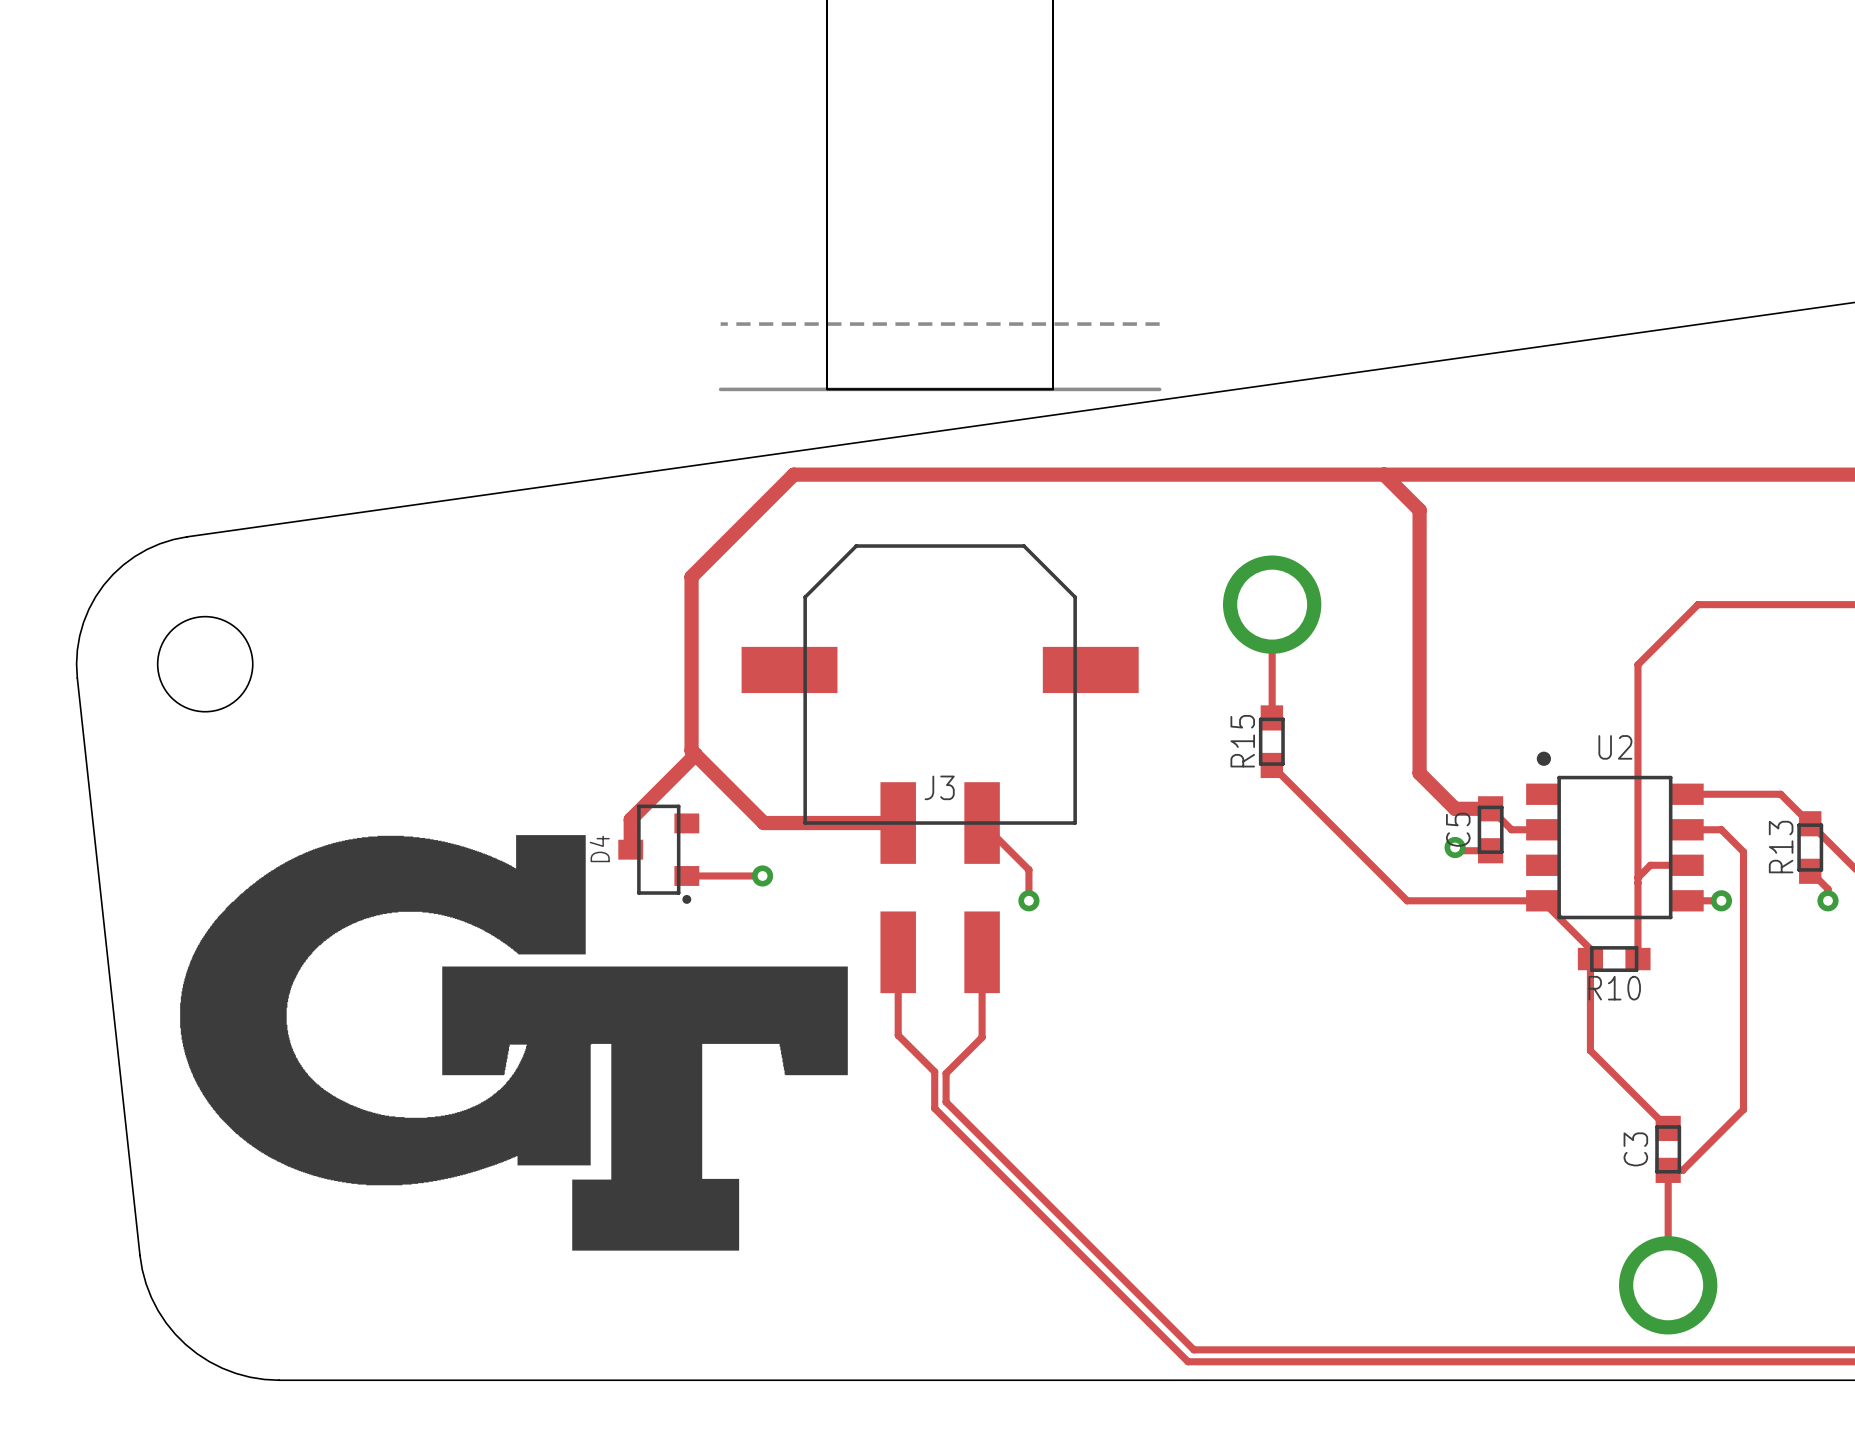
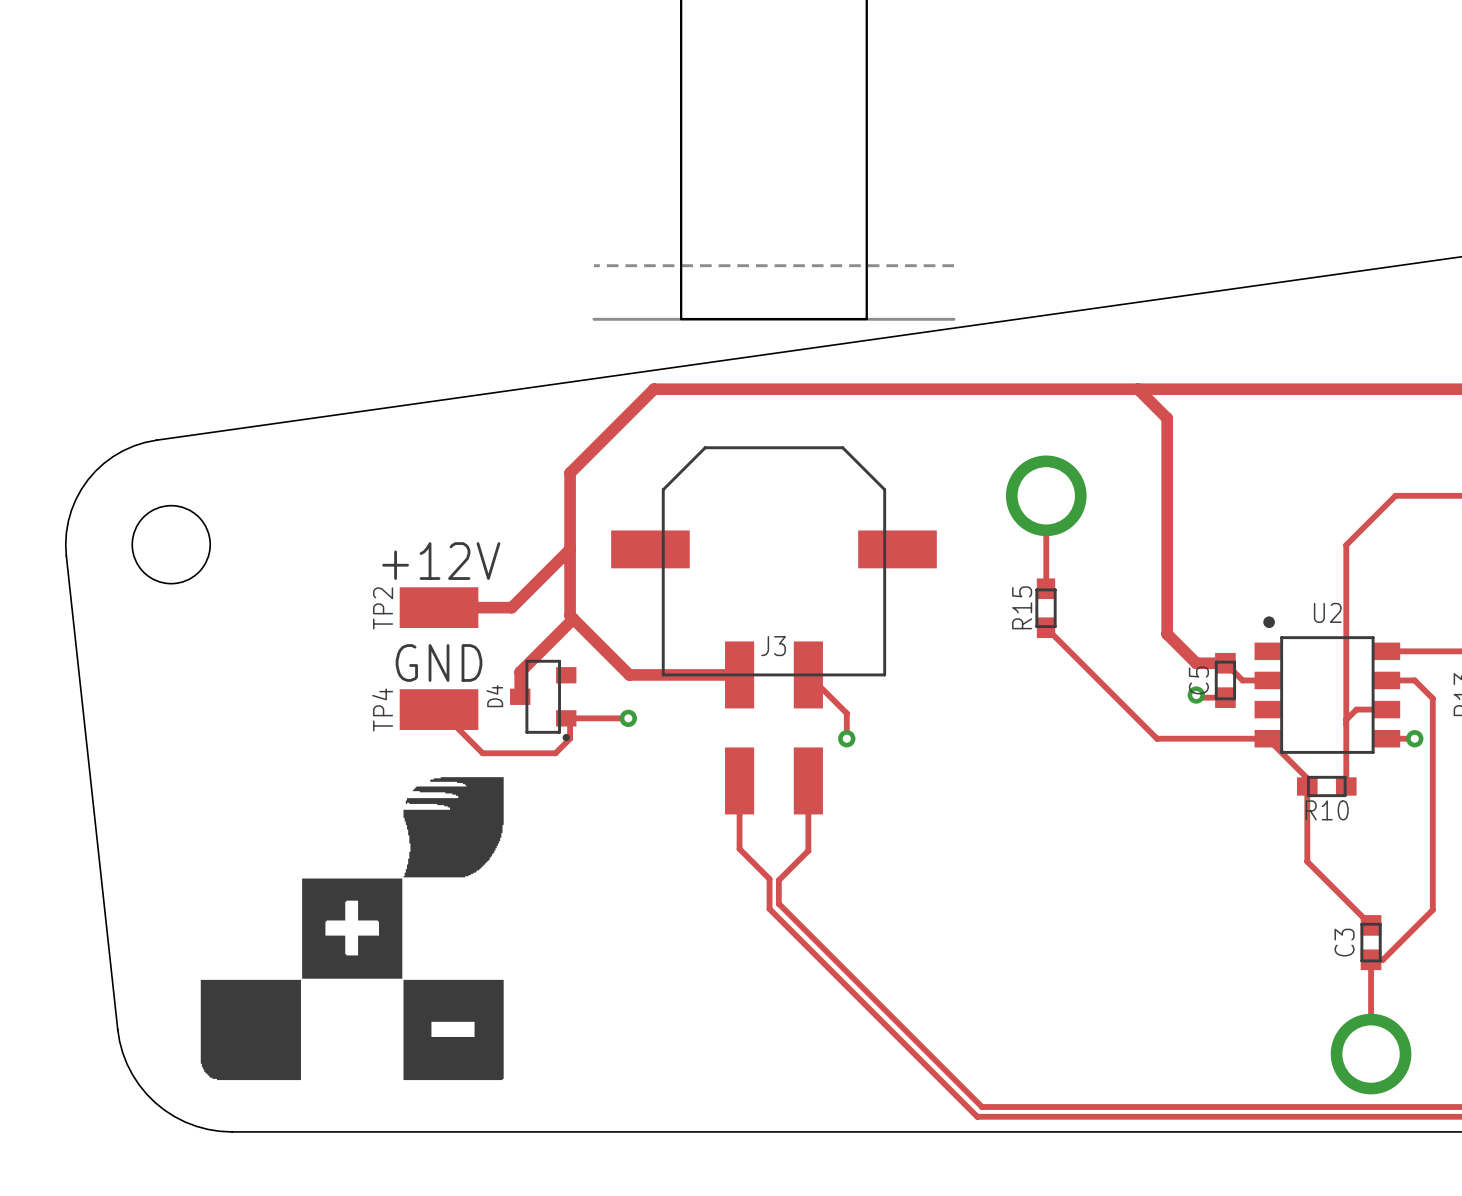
track: none -> (570, 549) (511, 607) (439, 607)
TP2: none -> (439, 607)
drawing: [180, 835, 848, 1251] -> none
track: none -> (439, 709) (482, 753) (555, 753) (570, 738) (570, 722) (566, 718)
TP4: none -> (439, 709)
drawing: none -> [200, 777, 504, 1081]

